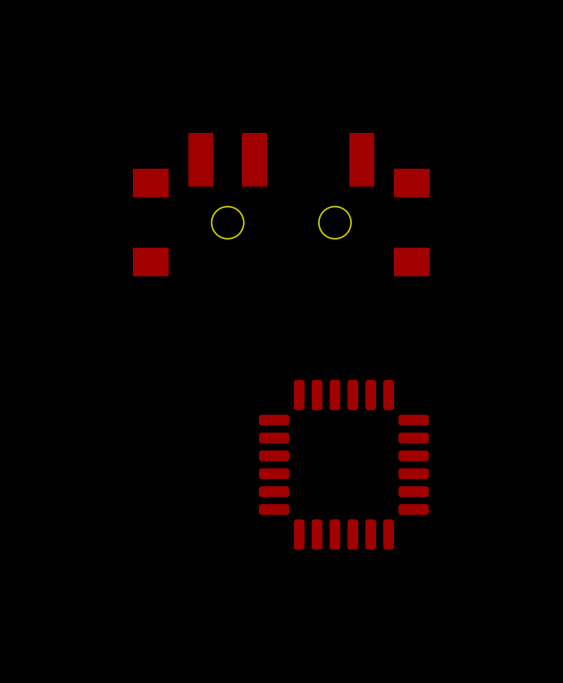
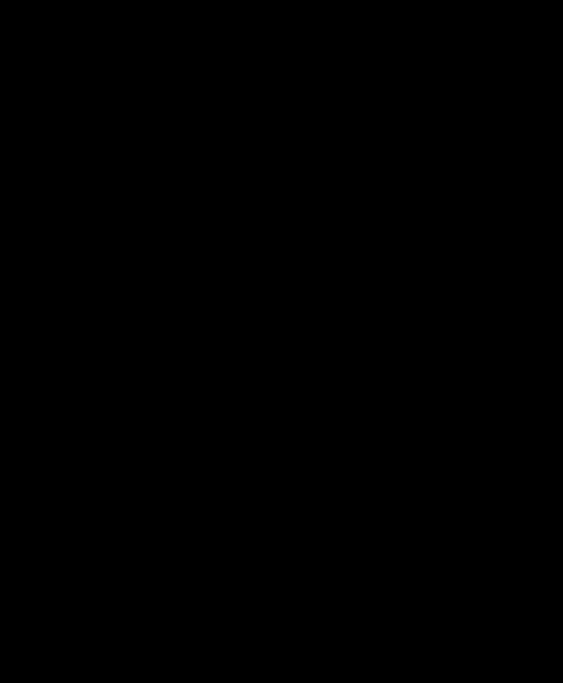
part: (281, 204) -> none
part: (343, 464) -> none

